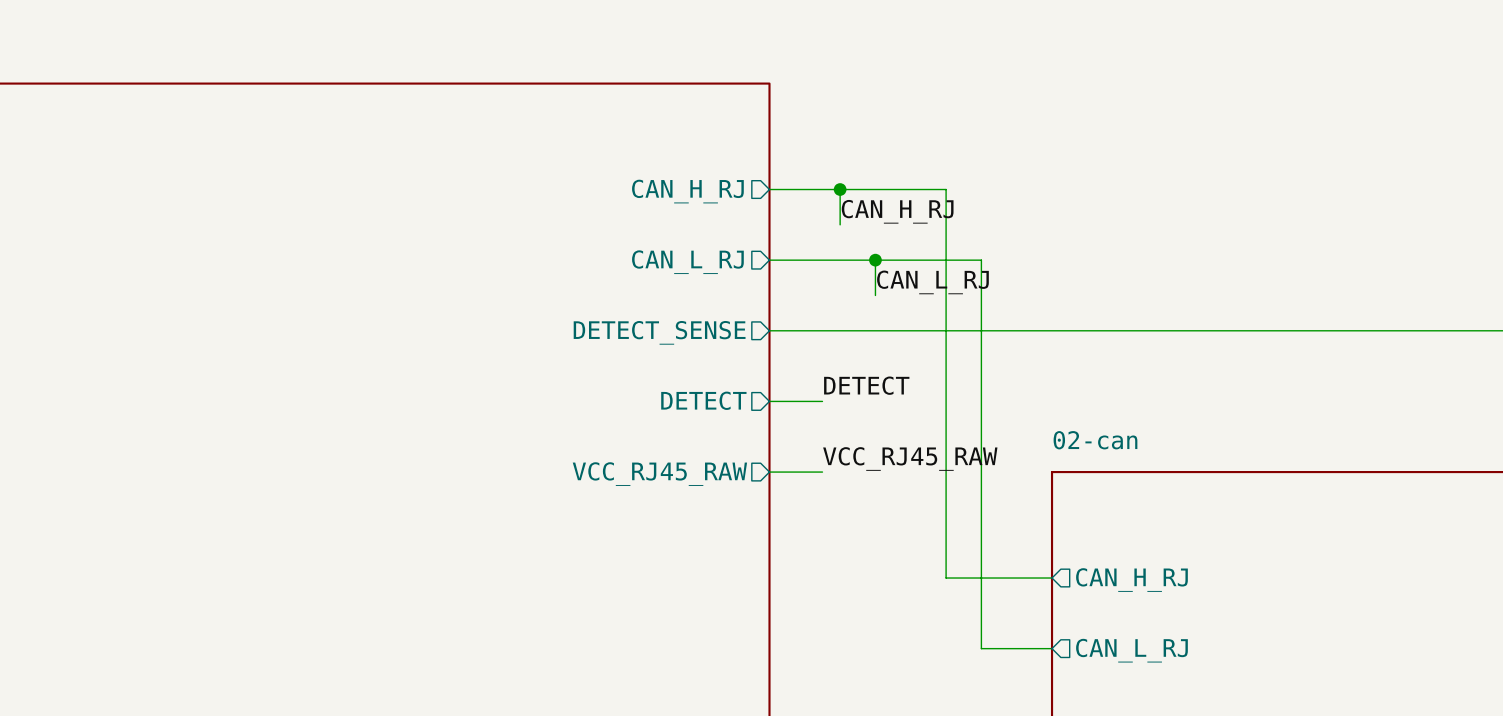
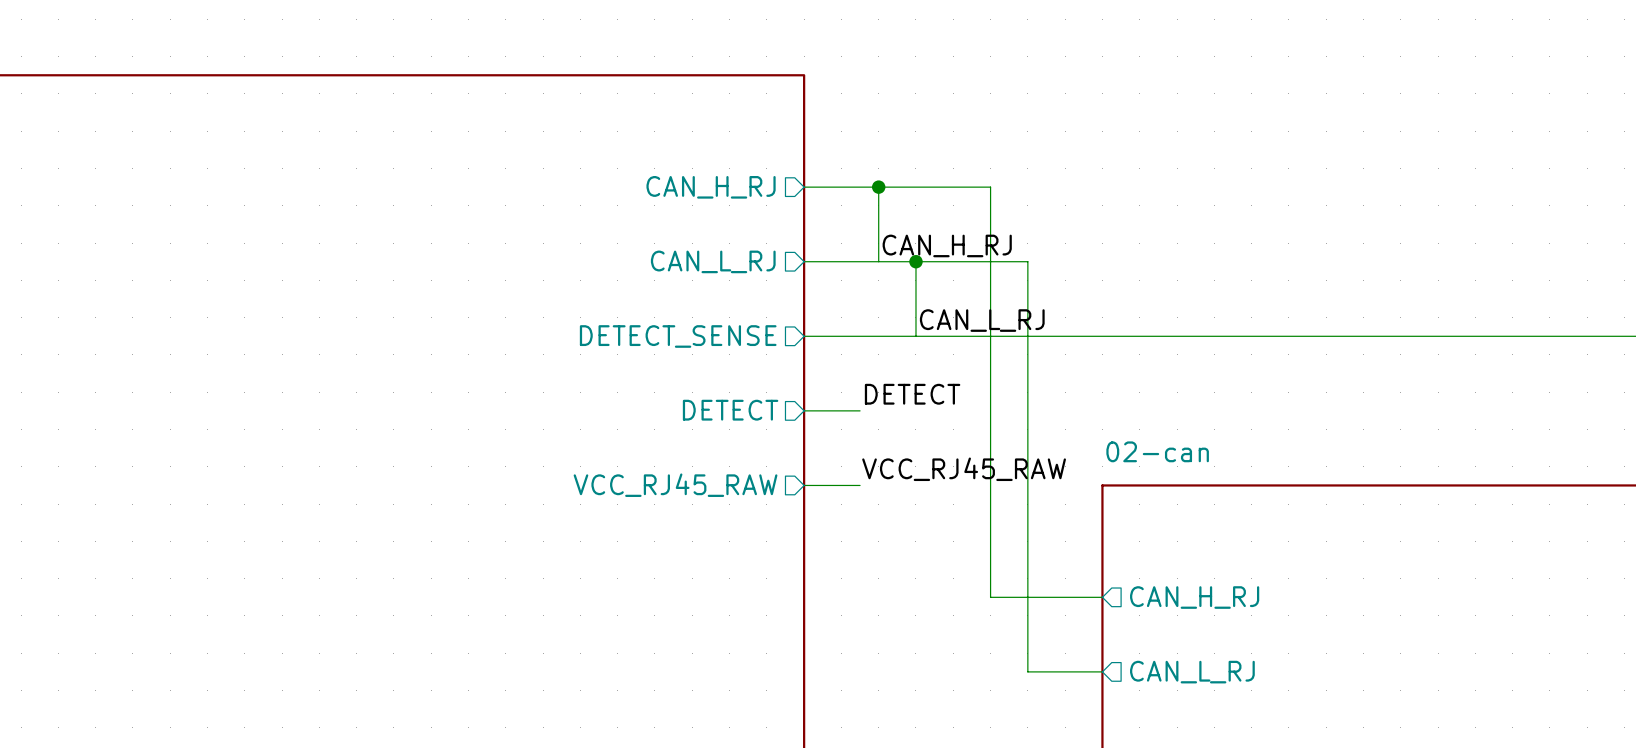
label position: CAN_H_RJ (897, 211) -> CAN_H_RJ (947, 245)
wire: none -> (878, 224) (878, 261)
label position: CAN_L_RJ (932, 282) -> CAN_L_RJ (982, 320)
wire: none -> (915, 299) (915, 336)

